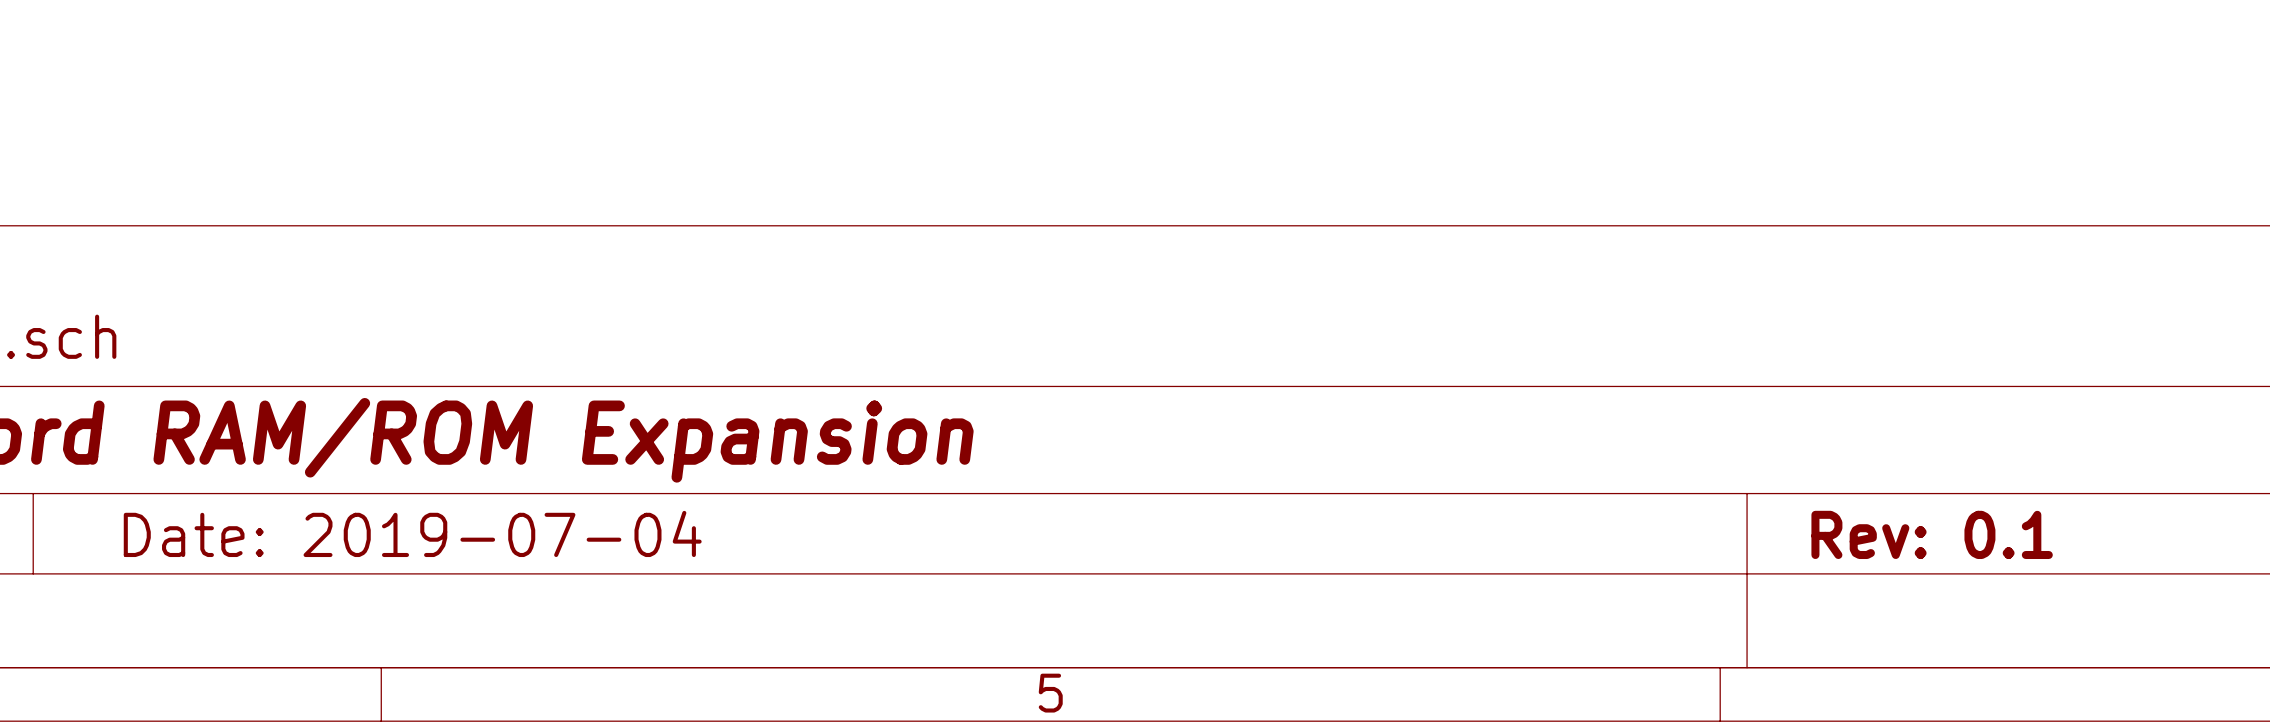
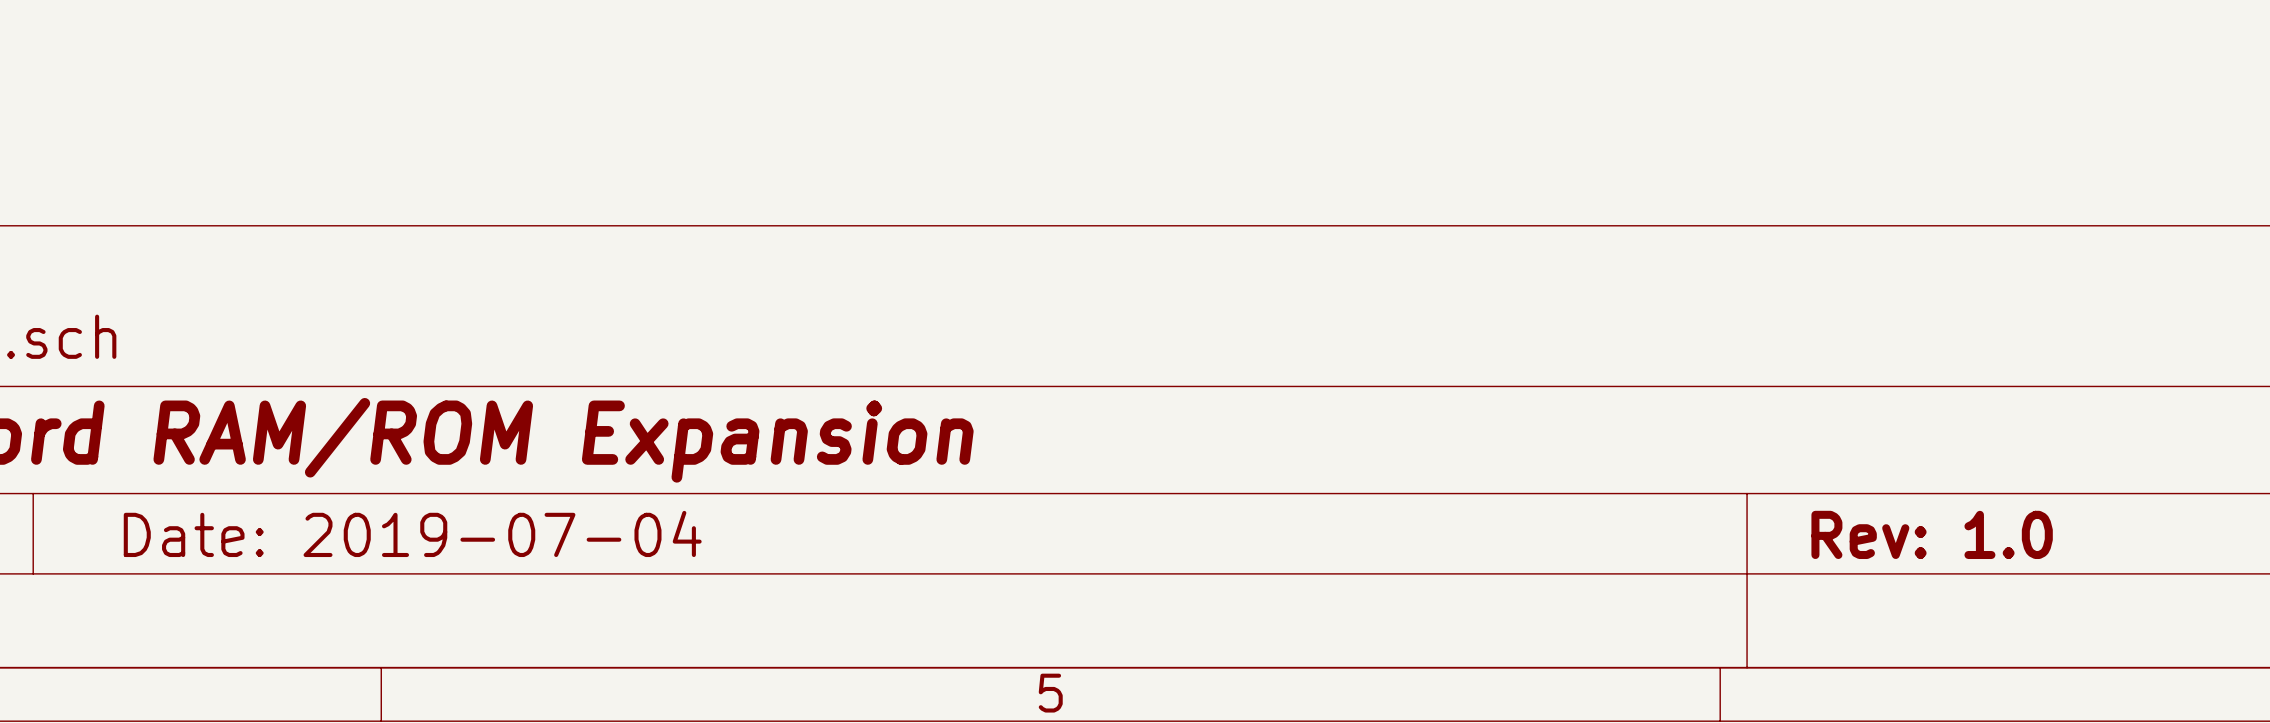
title block: Rev: 0.1 (1932, 534) -> Rev: 1.0 (1932, 534)

